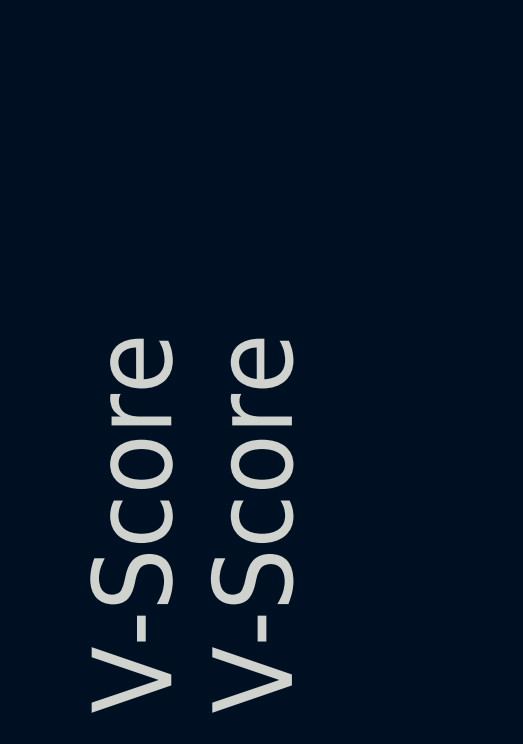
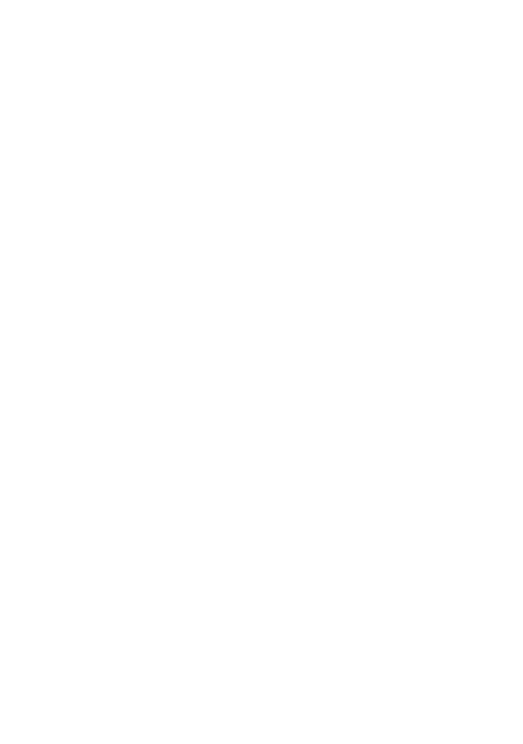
text: V-Score (131, 525) -> none
text: V-Score (252, 525) -> none

